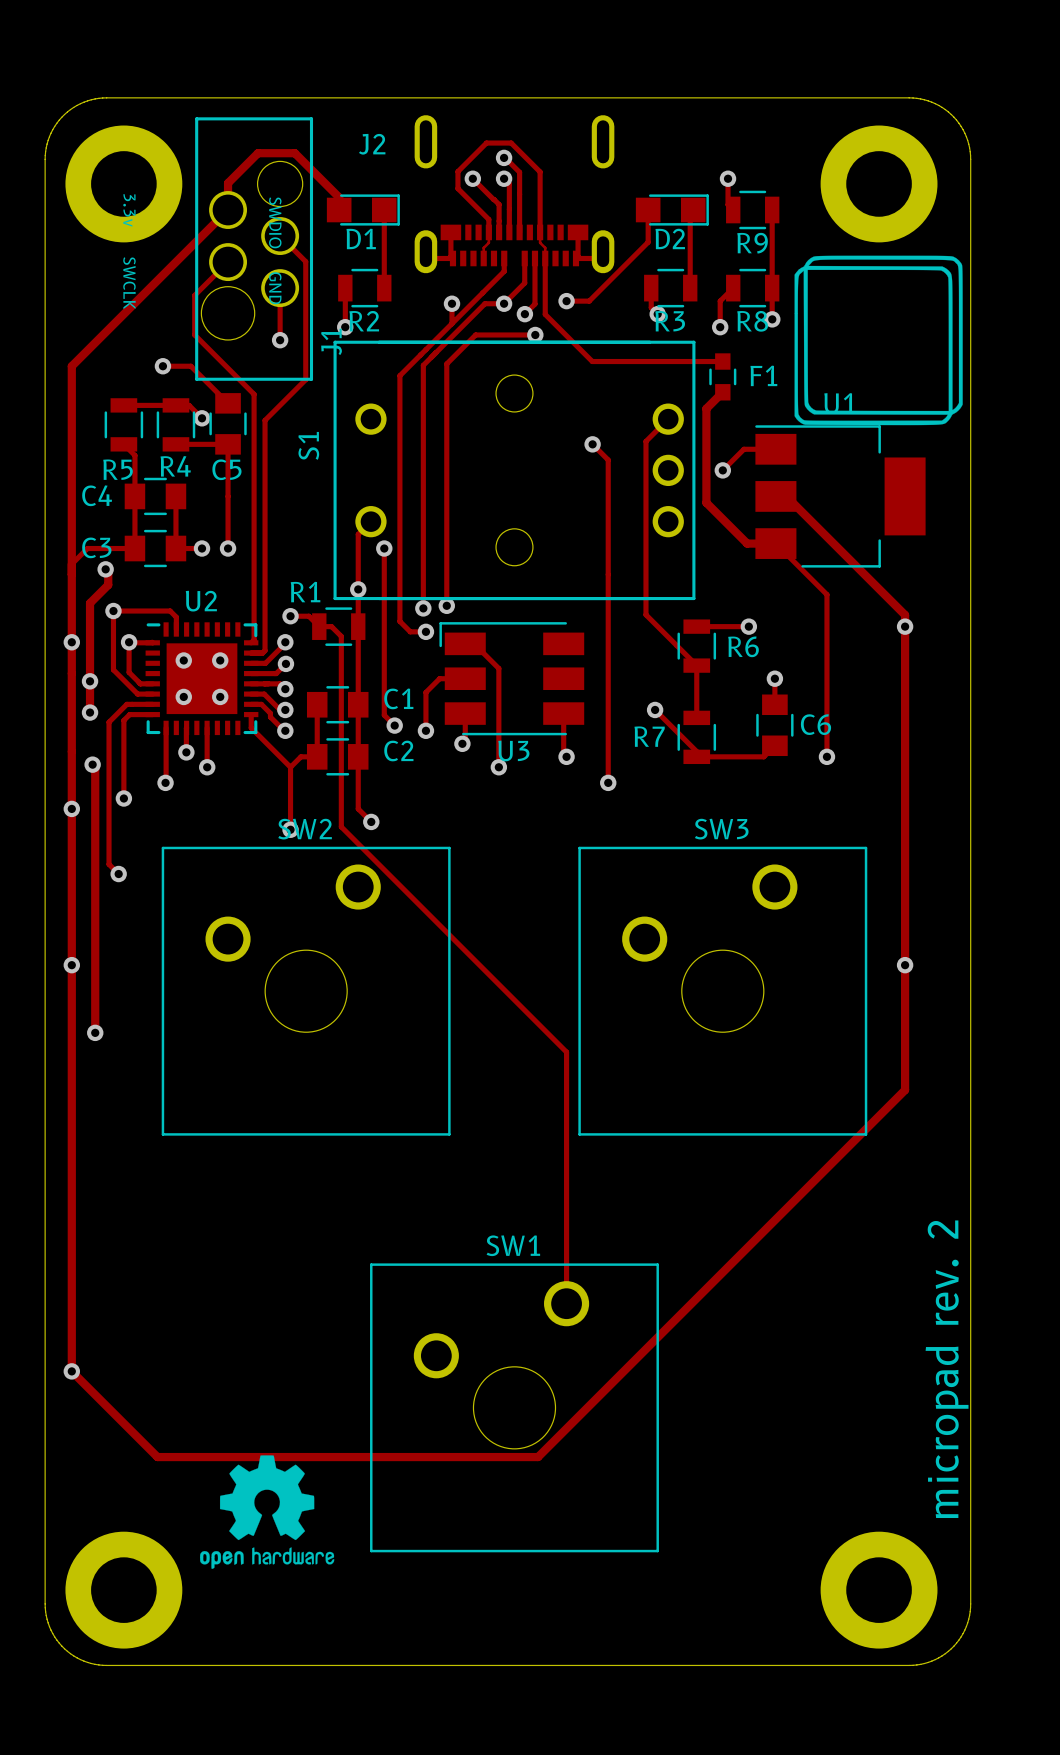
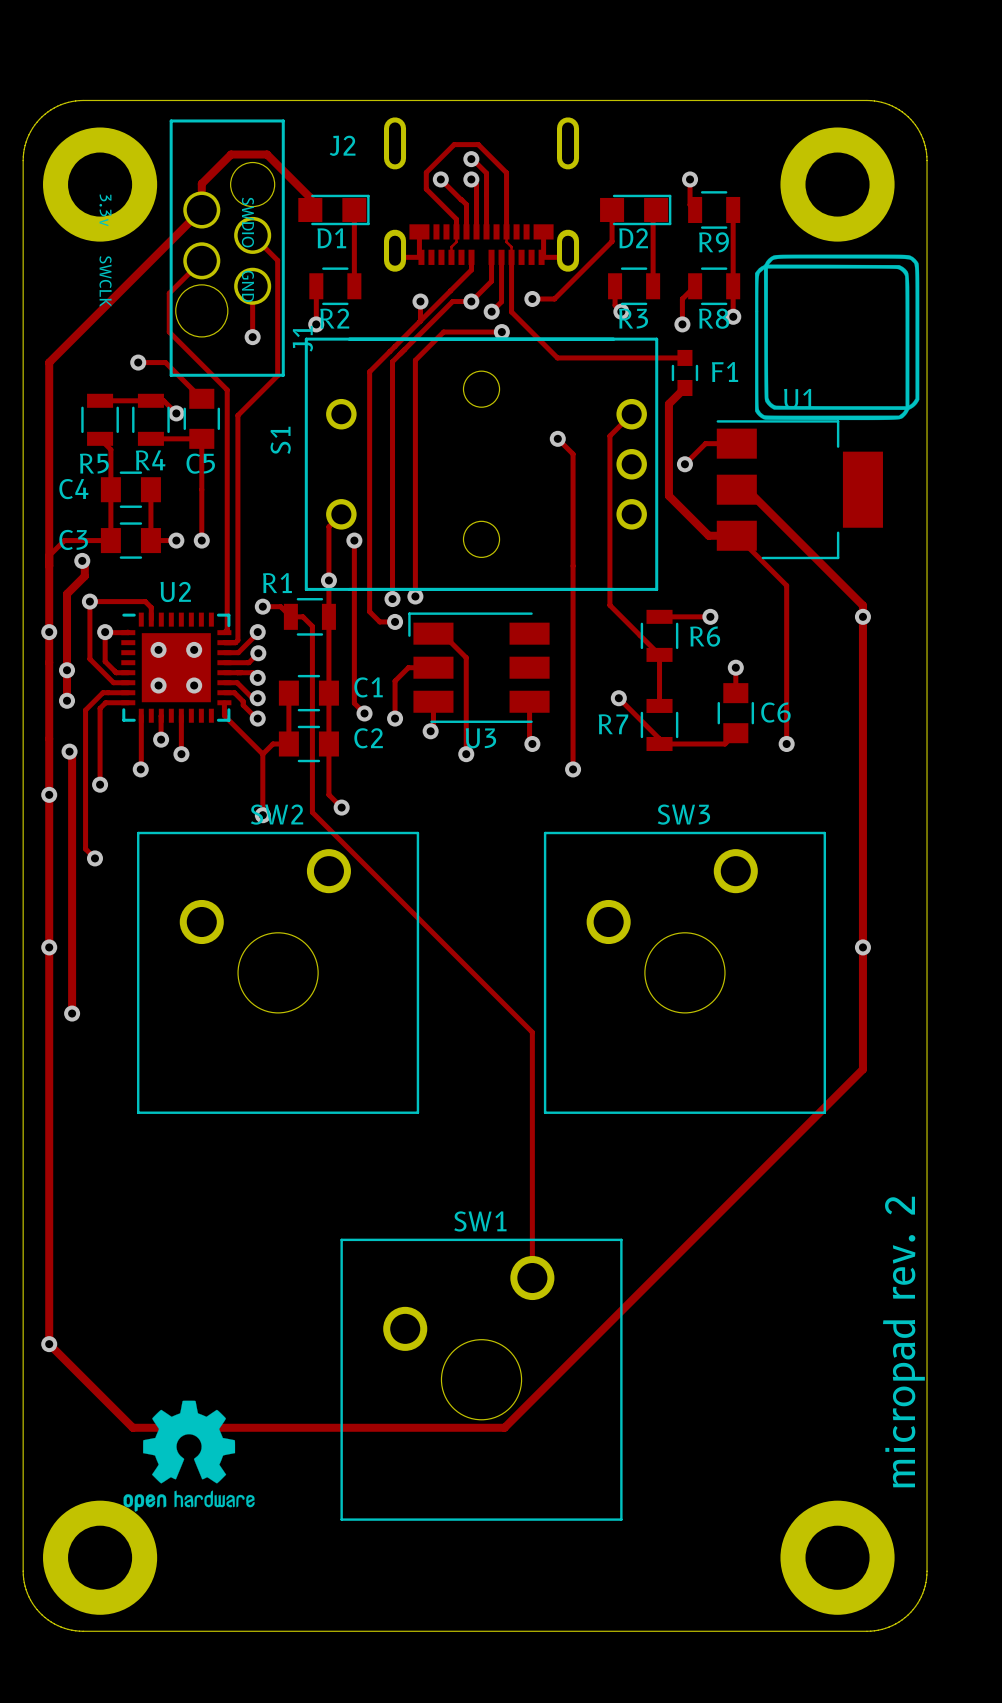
drawing position: (267, 1512) -> (189, 1456)

